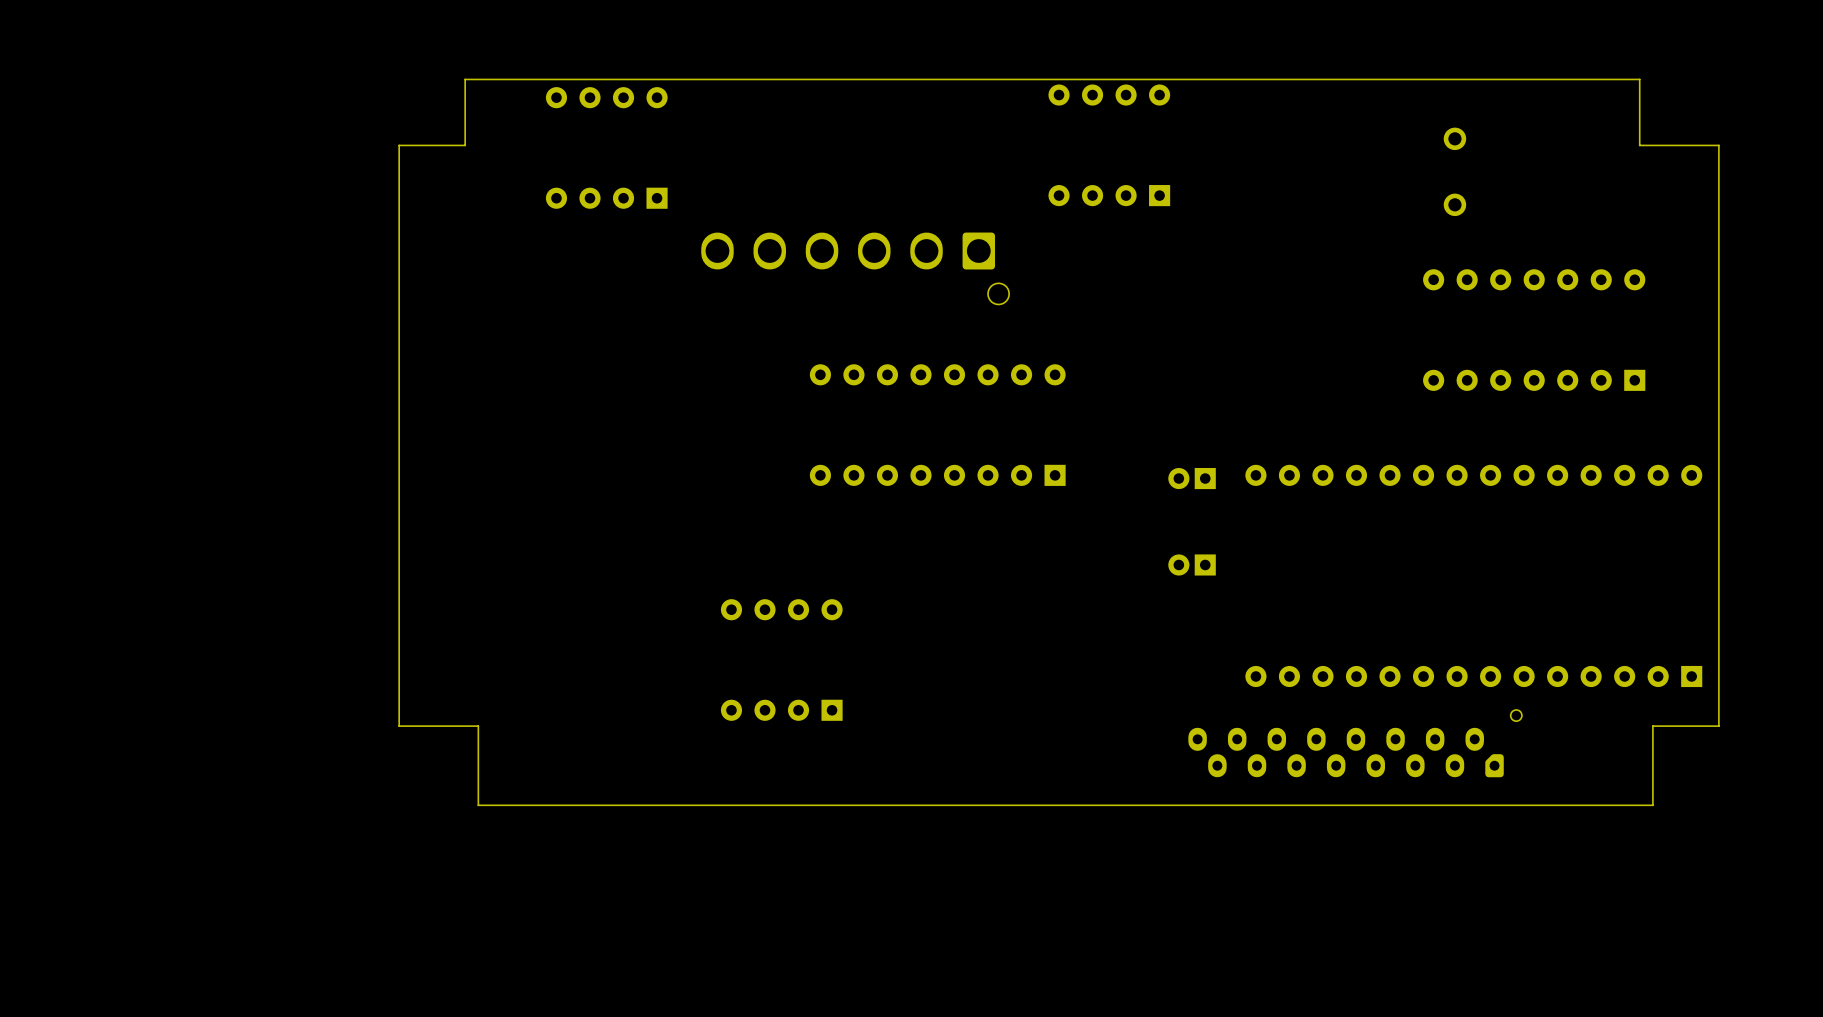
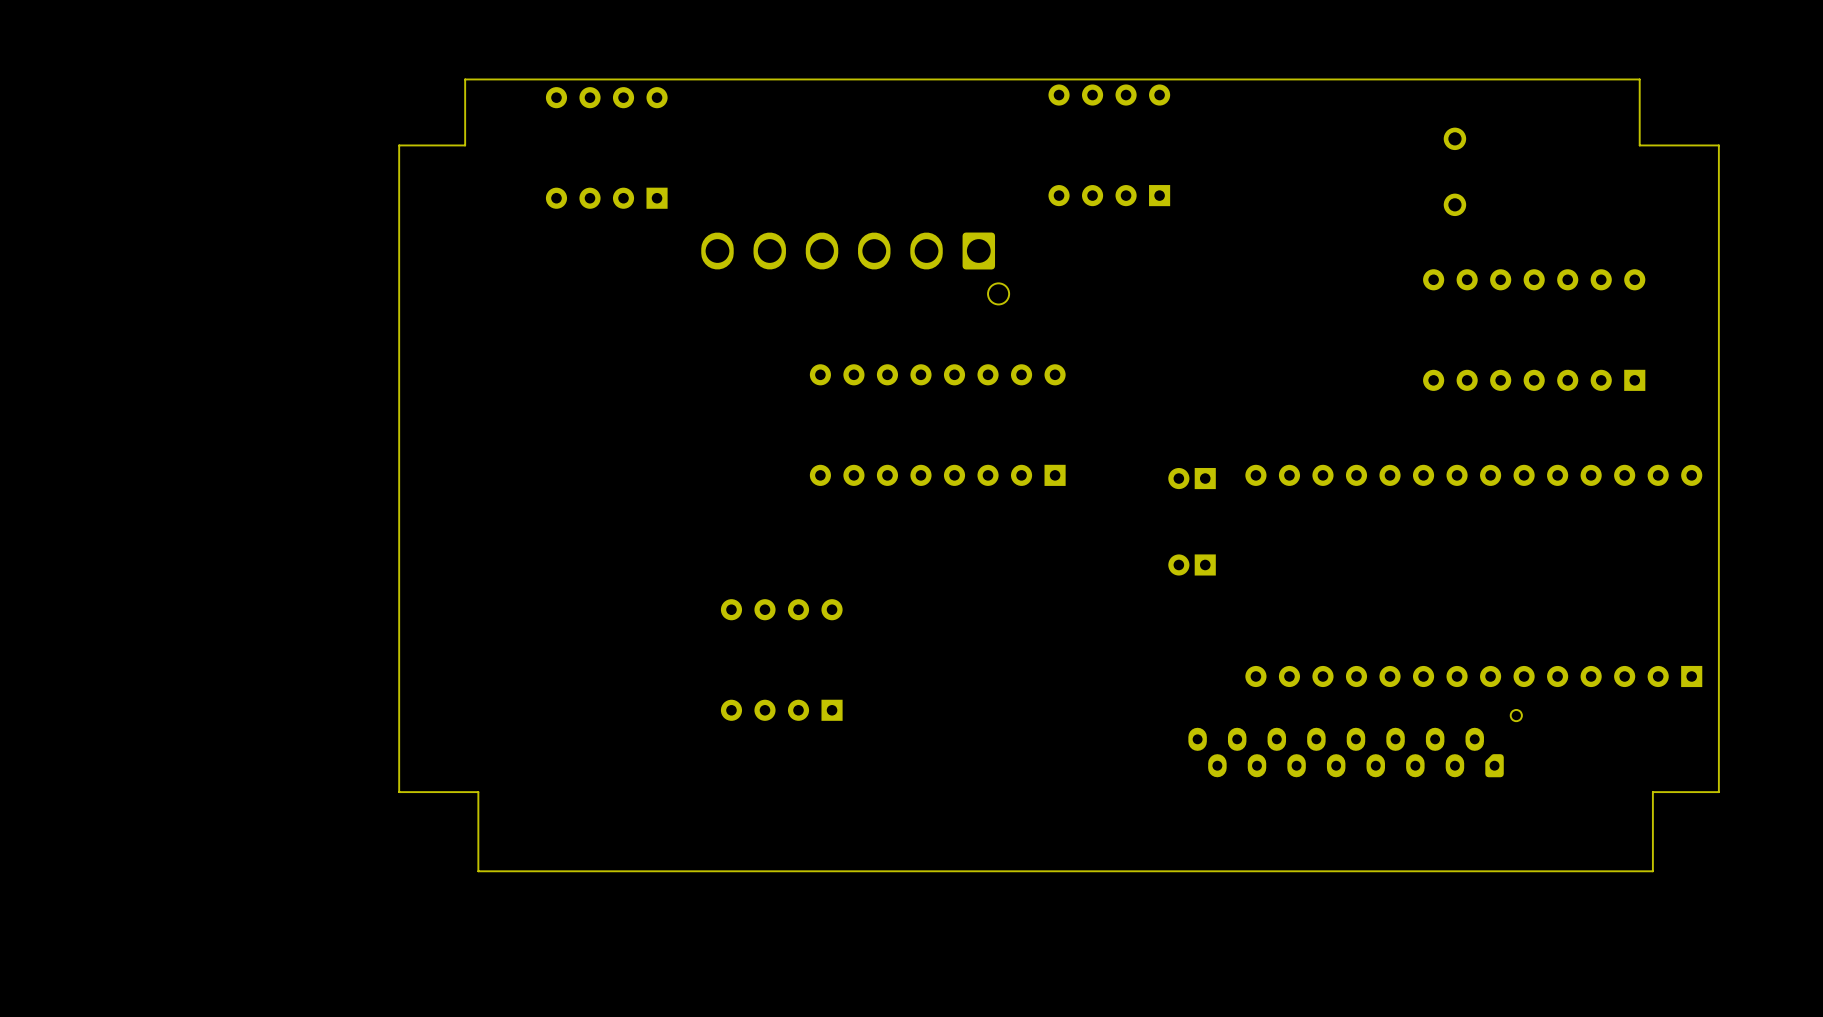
board edge: (399, 726) (478, 726) (478, 792) -> (399, 726) (399, 792) (478, 792)
board edge: (1718, 726) (1652, 726) (1652, 792) -> (1718, 726) (1718, 792) (1652, 792)
board edge: (1652, 805) (478, 805) -> (1652, 805) (1652, 871) (478, 871) (478, 805)

